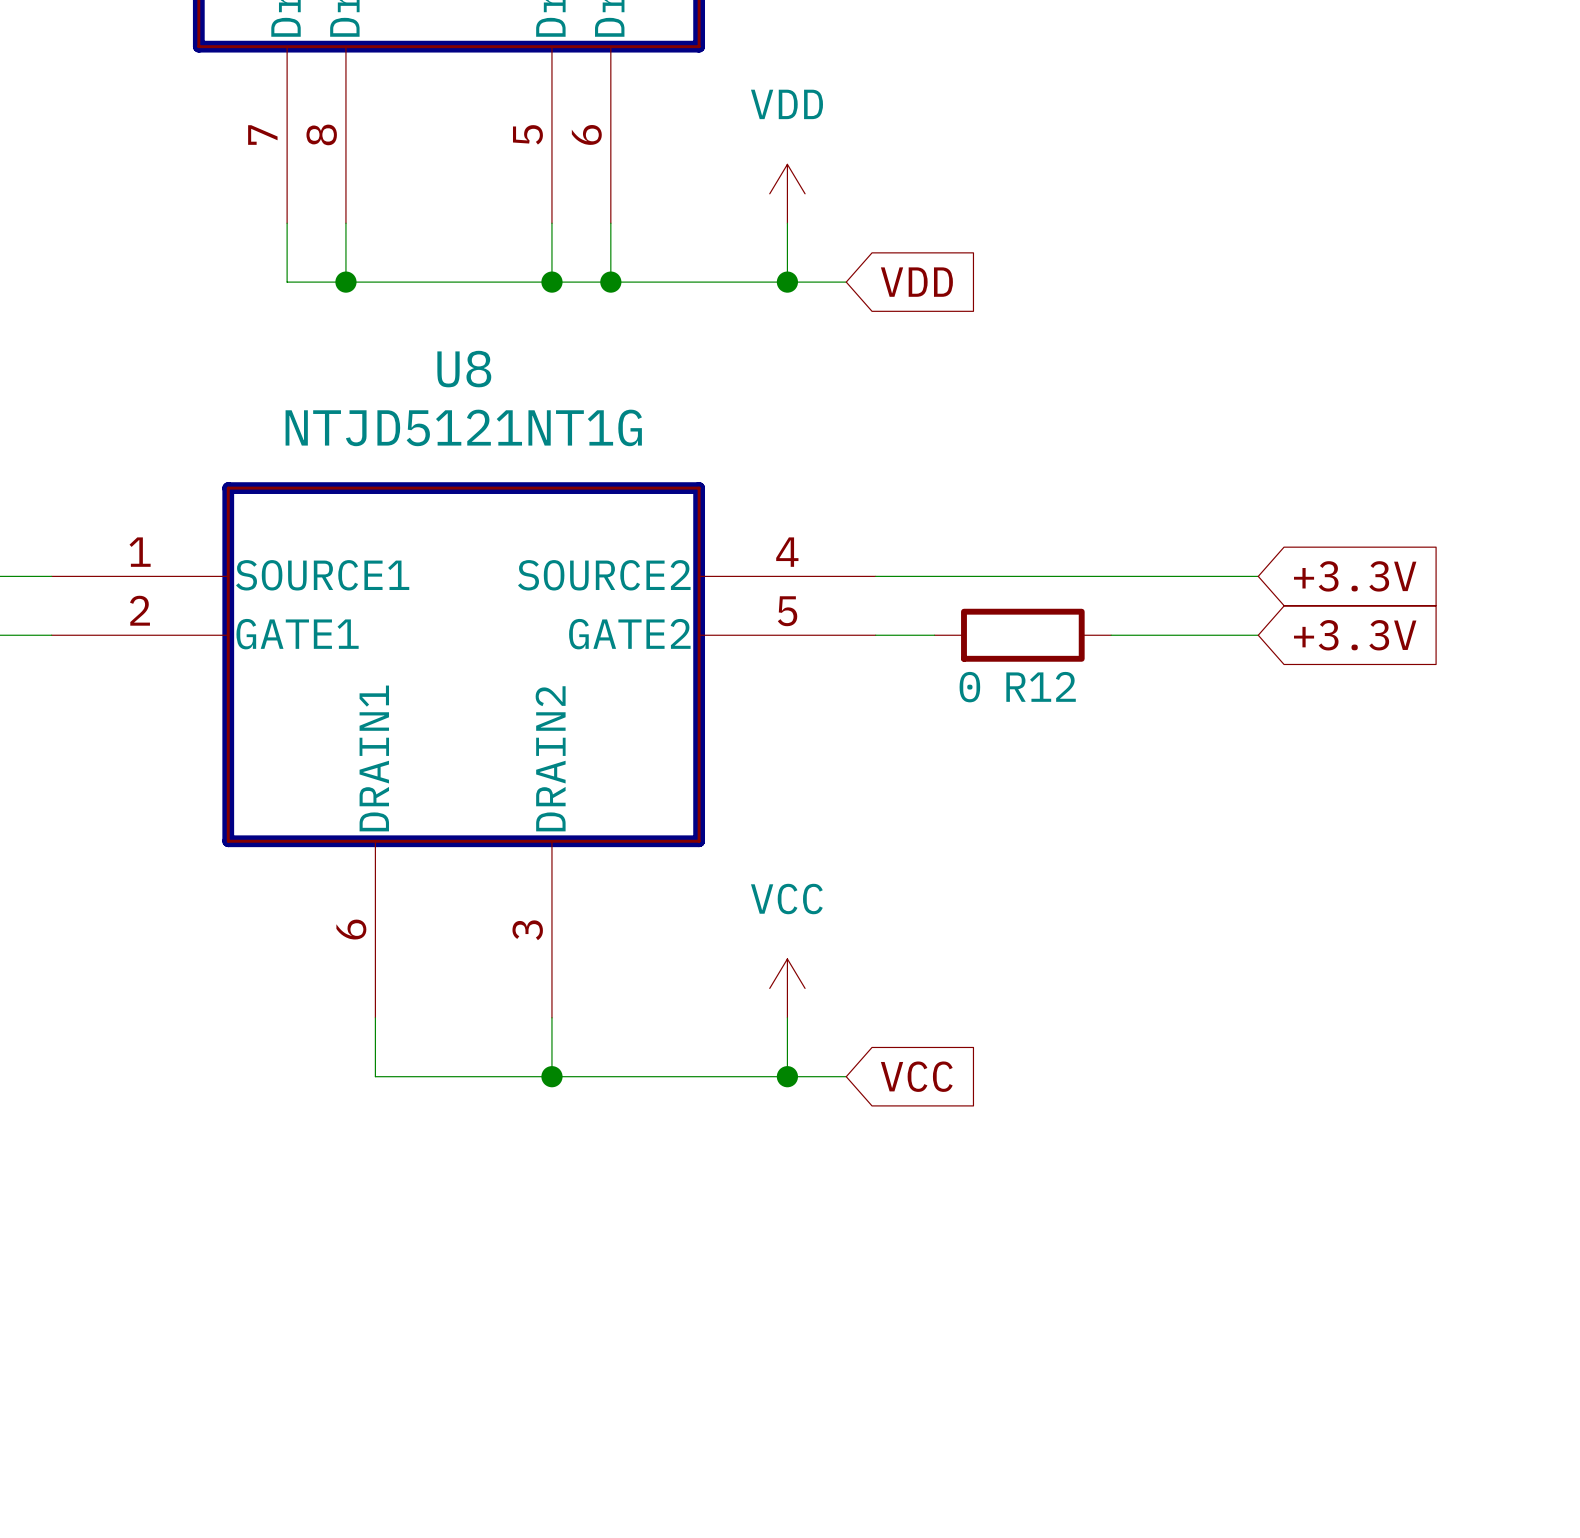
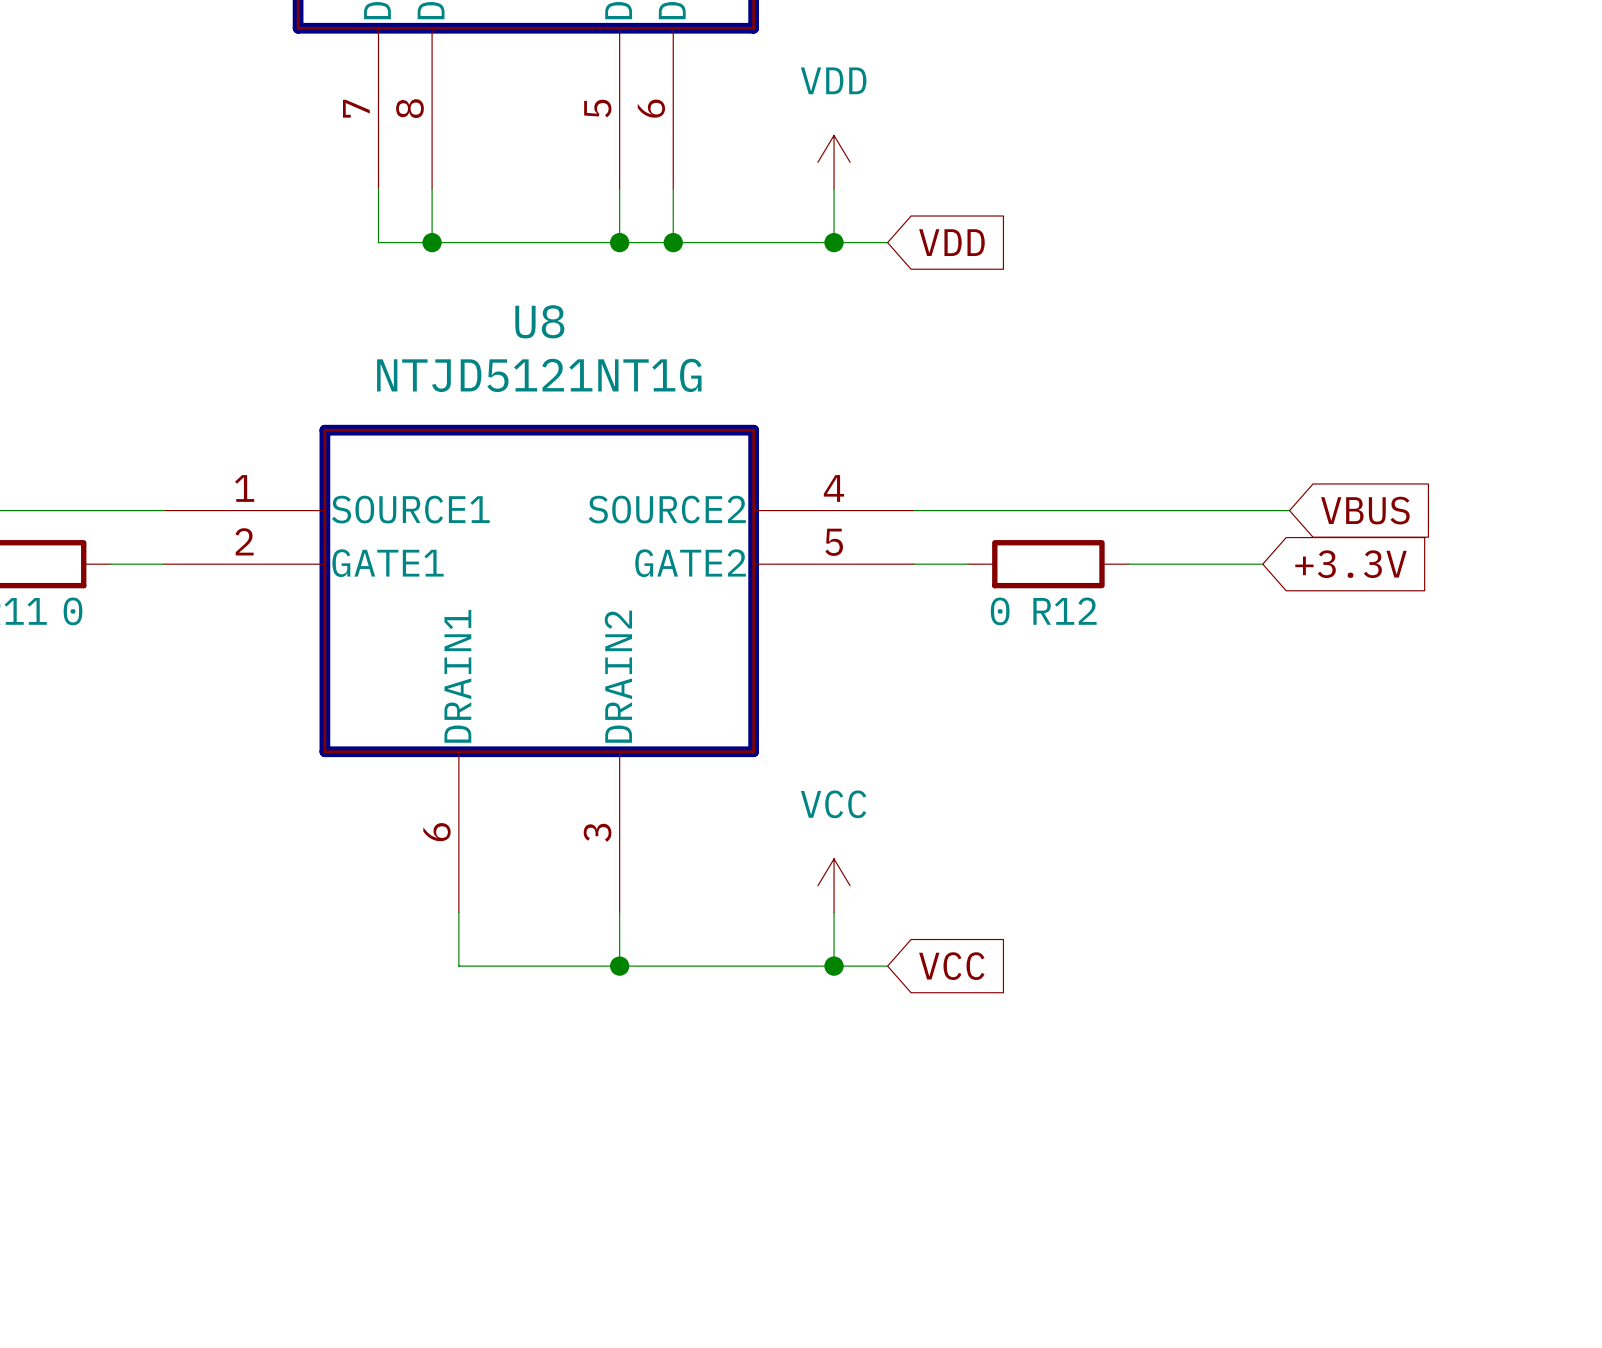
wire: none -> (1262, 510) (1289, 510)
global label: +3.3V (1355, 576) -> none
global label: none -> VBUS (1365, 510)

